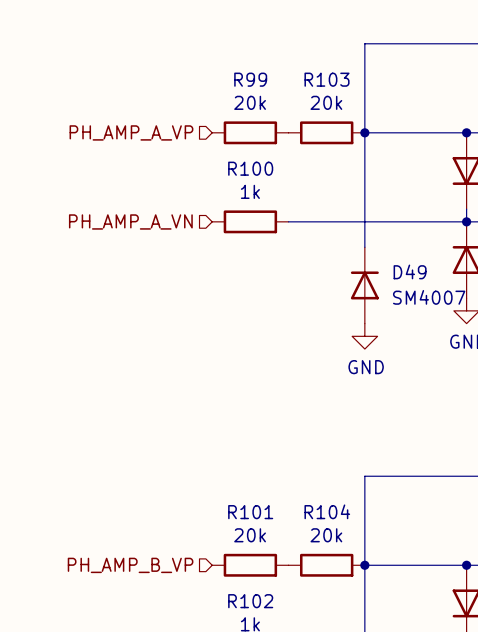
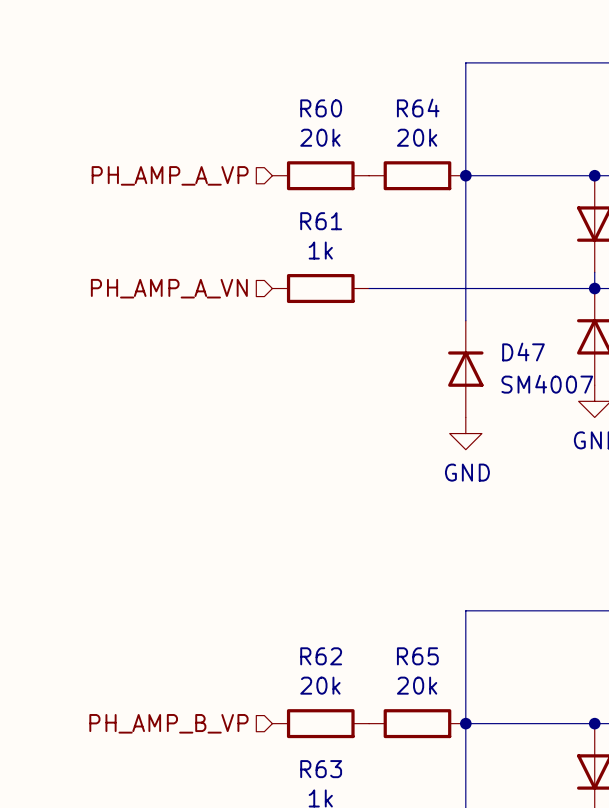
R99 name: R99 (250, 79) -> R60 (321, 108)
R103 name: R103 (327, 79) -> R64 (418, 108)
R100 name: R100 (250, 168) -> R61 (321, 221)
D49 name: D49 (410, 271) -> D47 (523, 352)
R104 name: R104 (327, 511) -> R65 (417, 656)
R101 name: R101 (250, 512) -> R62 (321, 656)
R102 name: R102 (250, 601) -> R63 (321, 769)

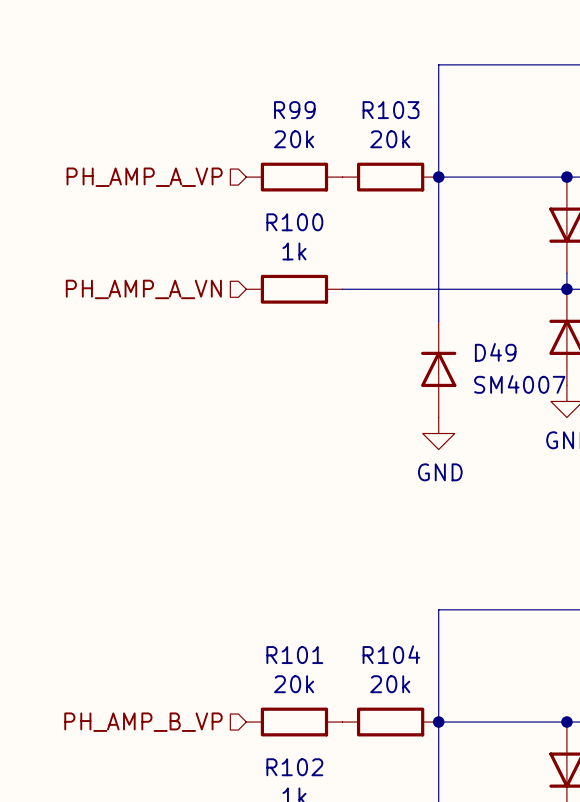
R60 name: R60 (321, 108) -> R99 (294, 110)
R64 name: R64 (418, 108) -> R103 (391, 110)
R61 name: R61 (321, 221) -> R100 (294, 222)
D47 name: D47 (523, 352) -> D49 (495, 352)
R62 name: R62 (321, 656) -> R101 (294, 655)
R65 name: R65 (417, 656) -> R104 (391, 654)
R63 name: R63 (321, 769) -> R102 (294, 767)

